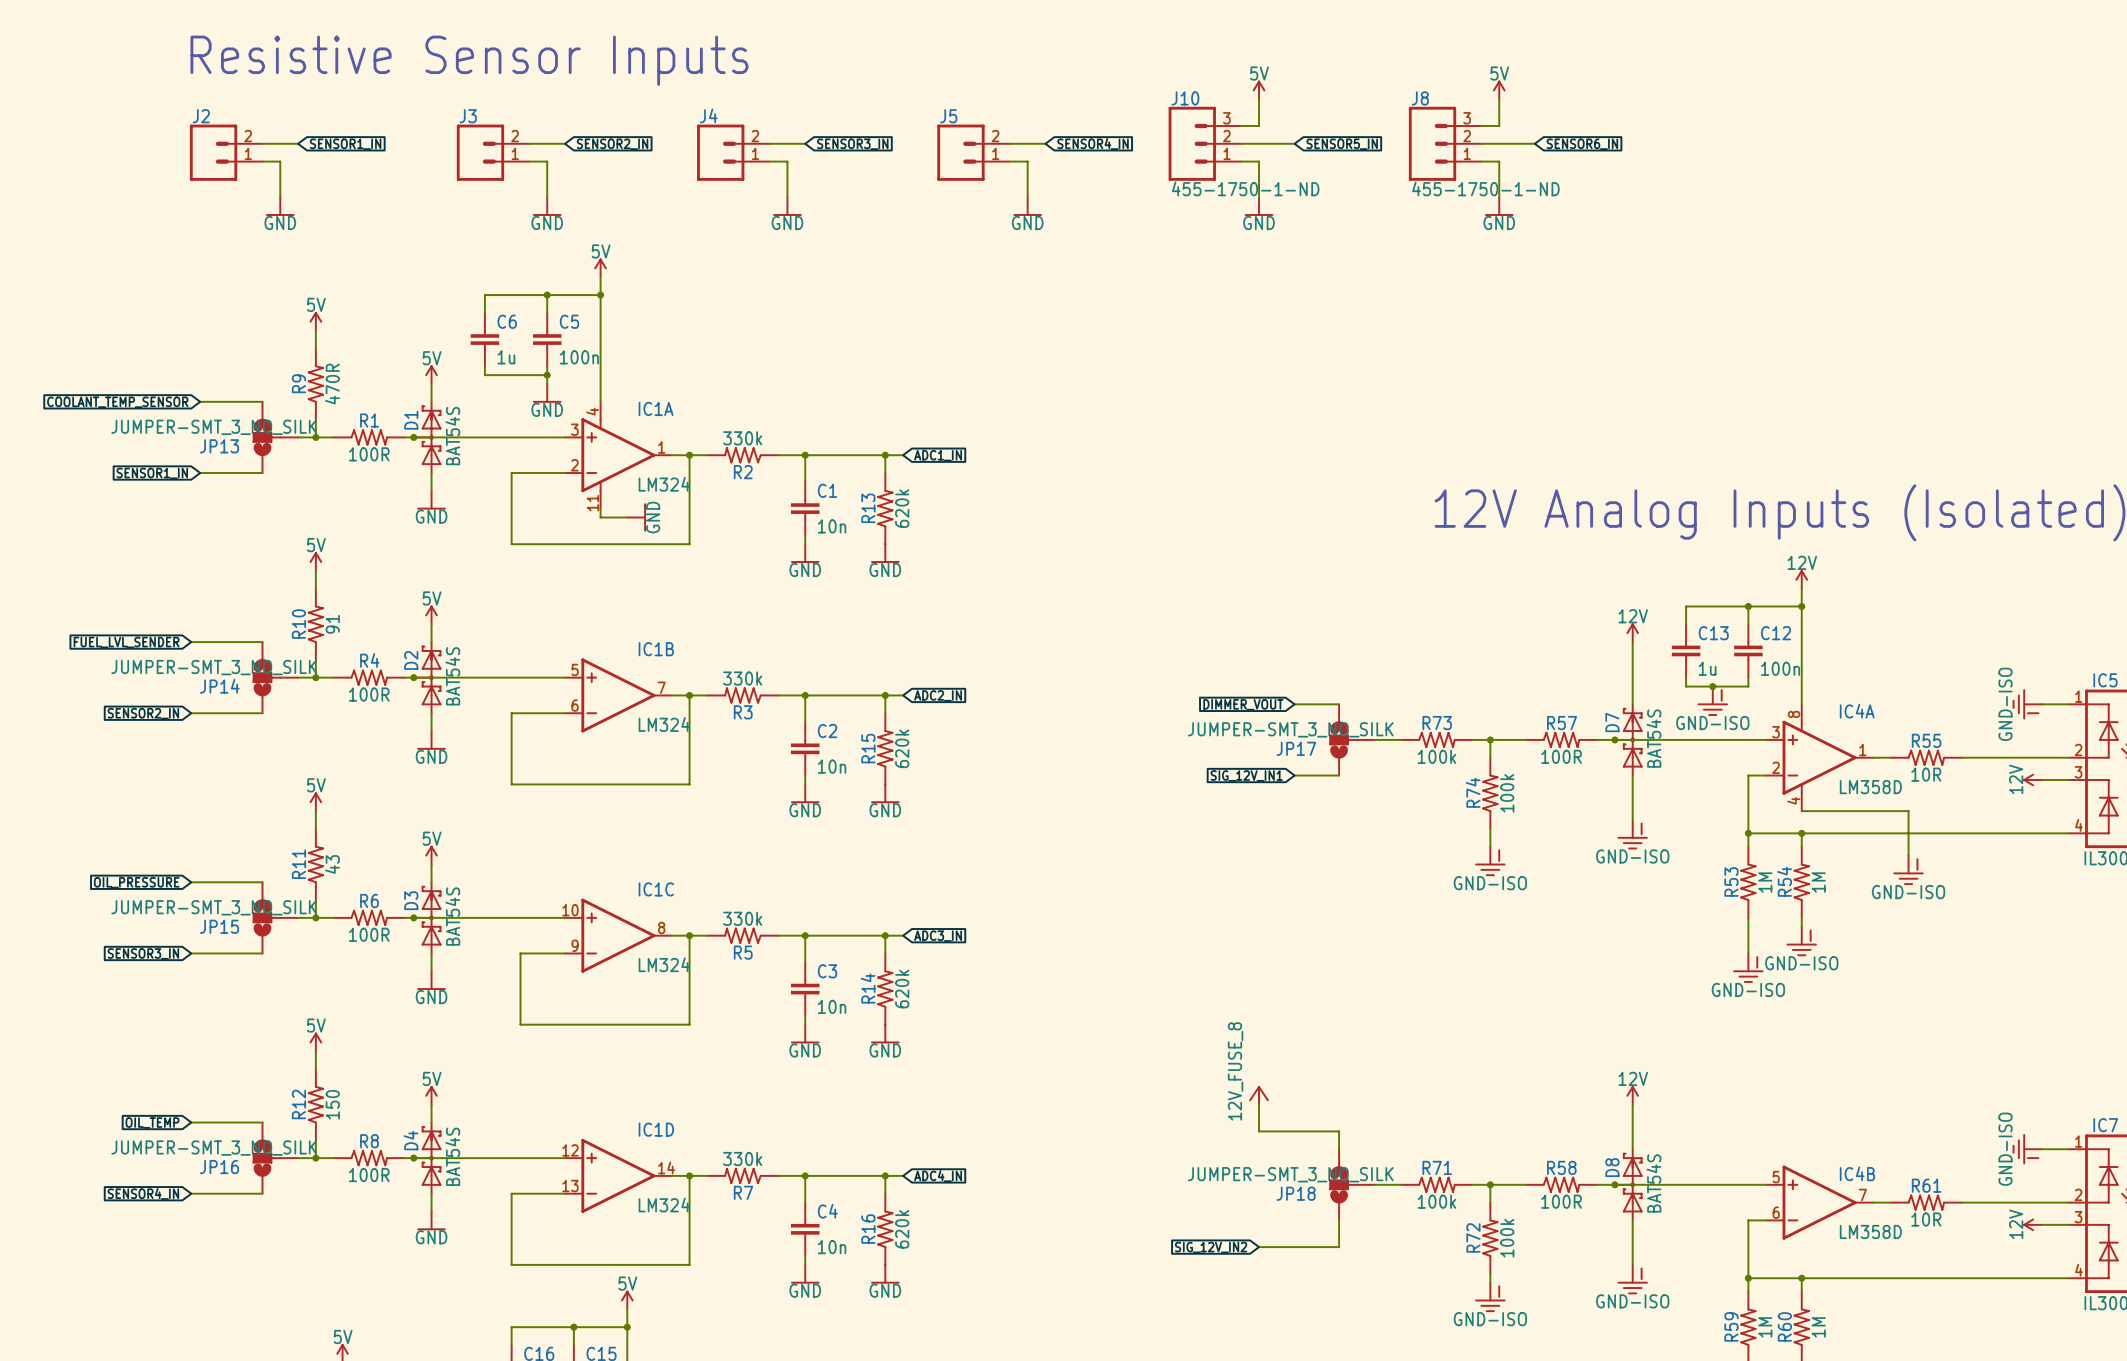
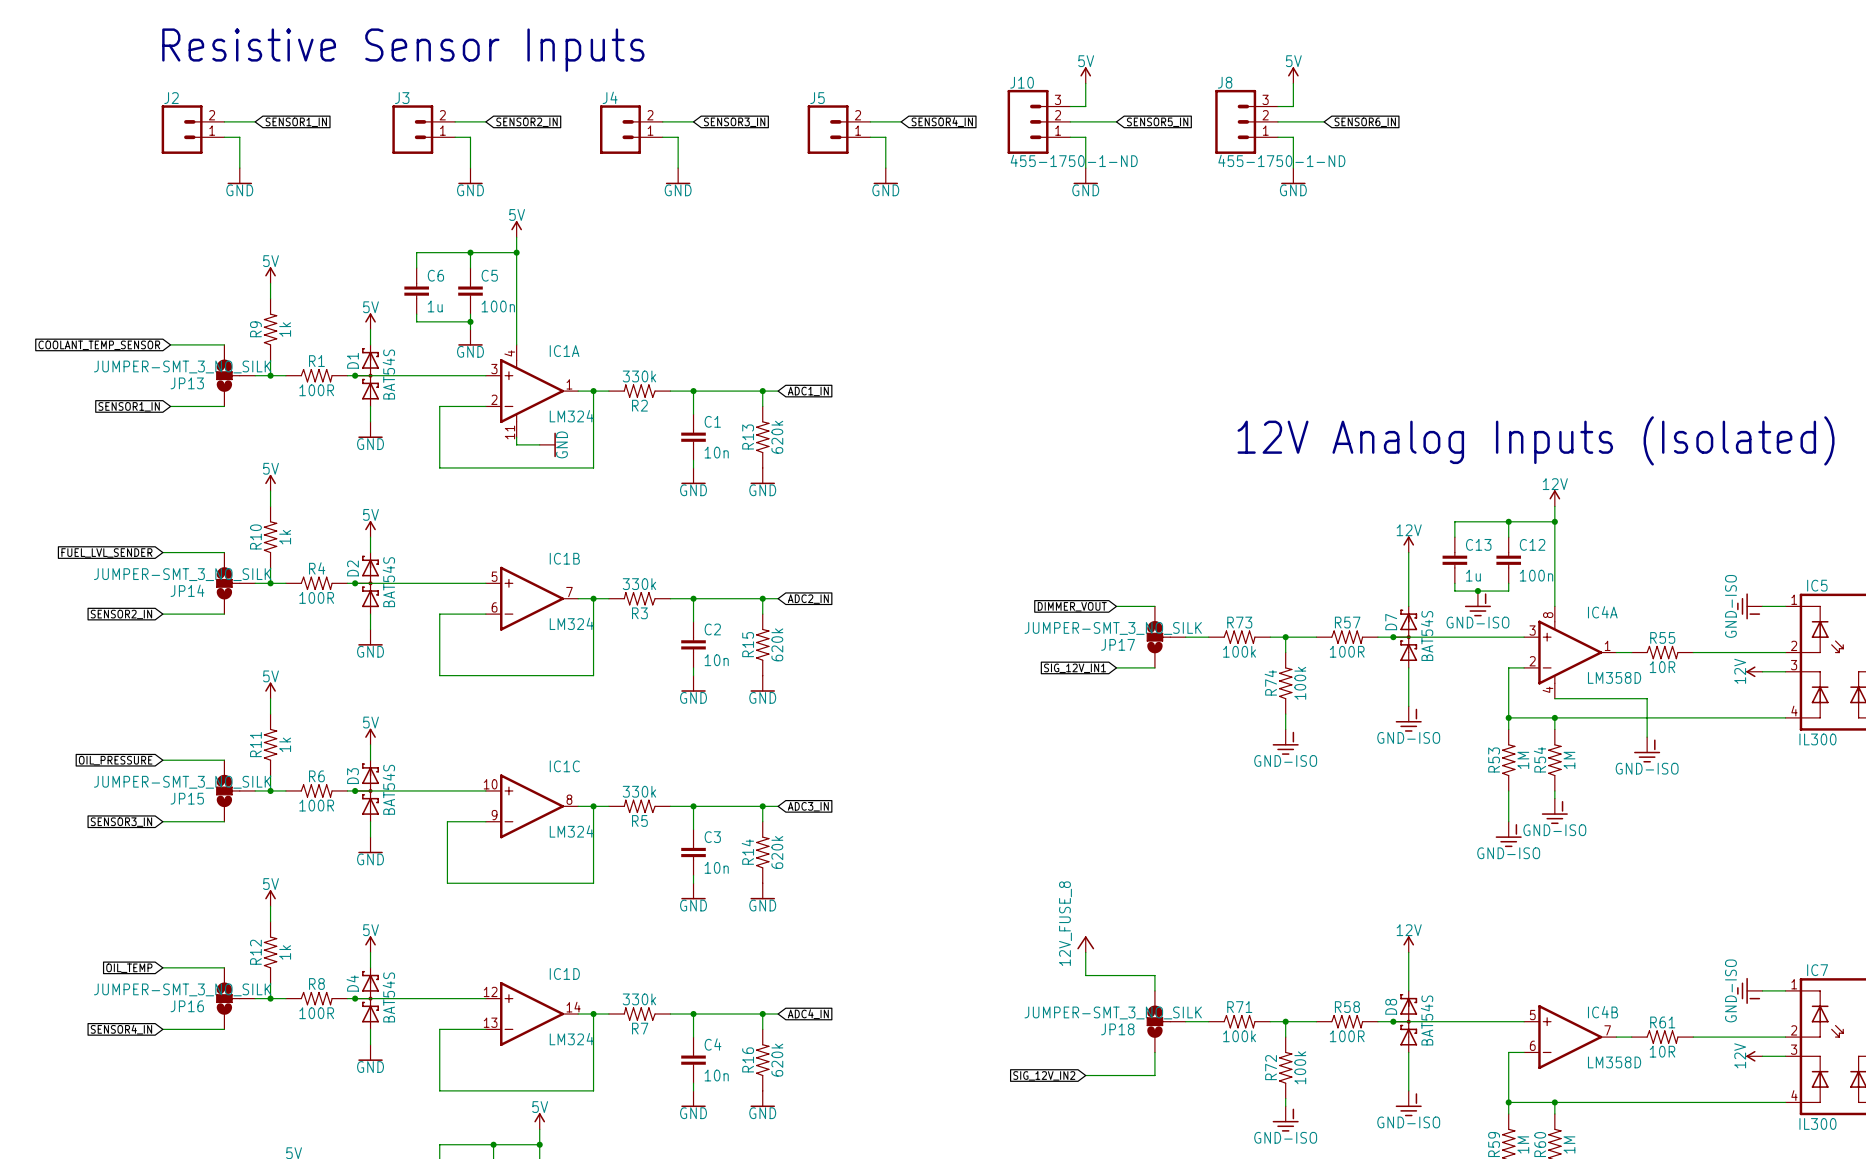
R9 value: 470R (332, 384) -> 1k (285, 329)
R10 value: 91 (332, 624) -> 1k (285, 537)
R11 value: 43 (332, 864) -> 1k (285, 744)
R12 value: 150 (332, 1104) -> 1k (285, 952)

